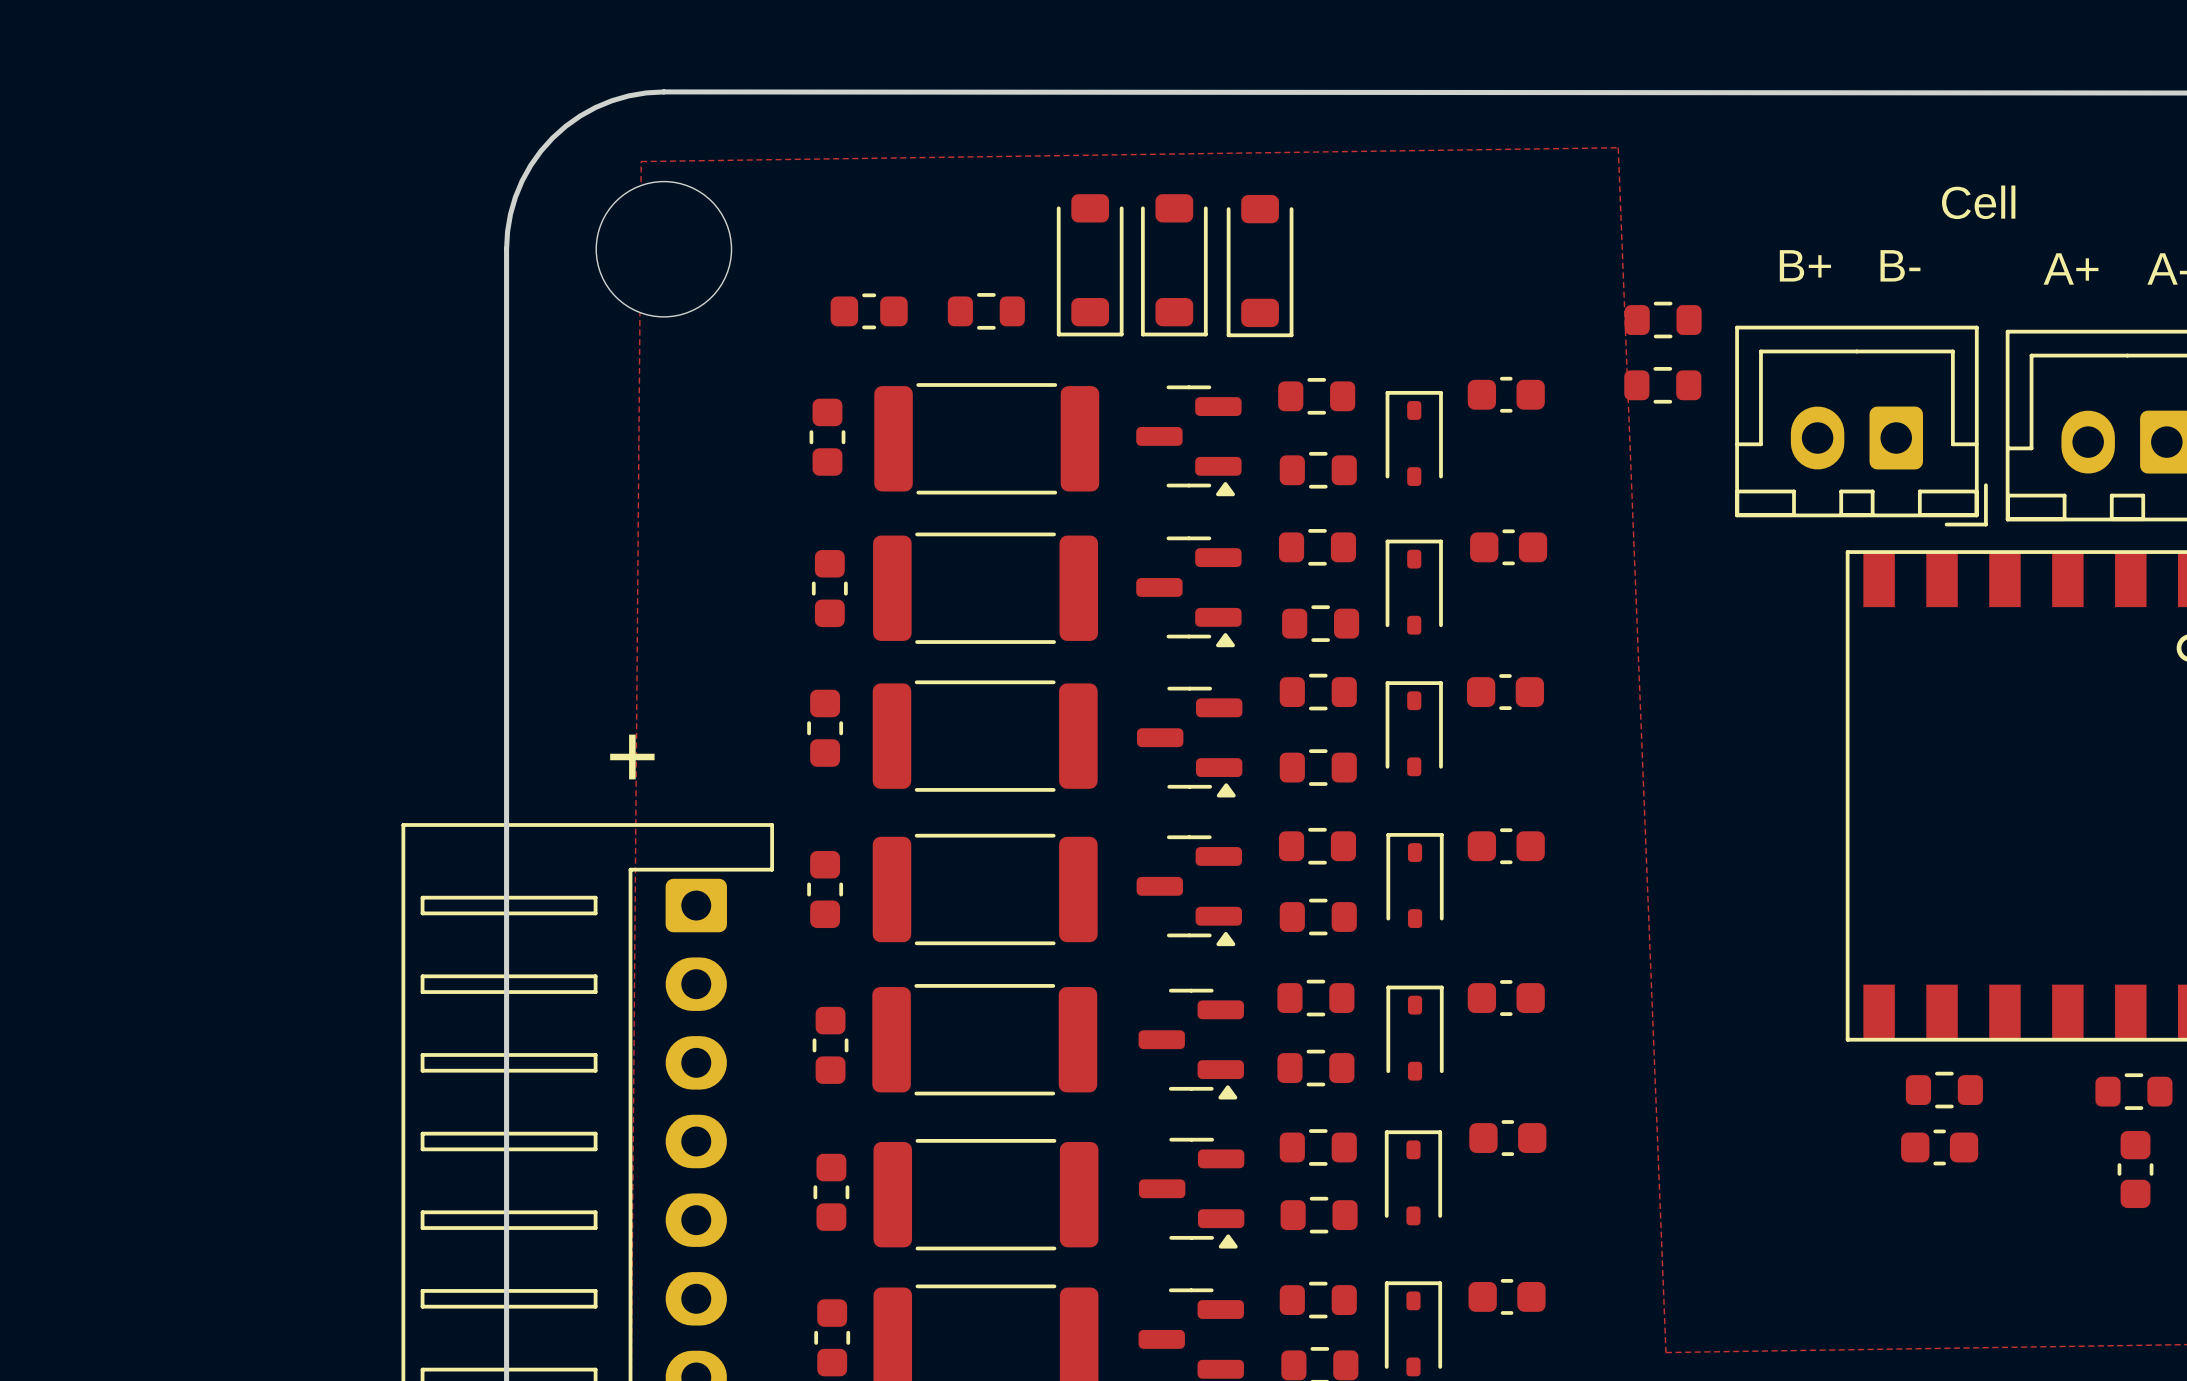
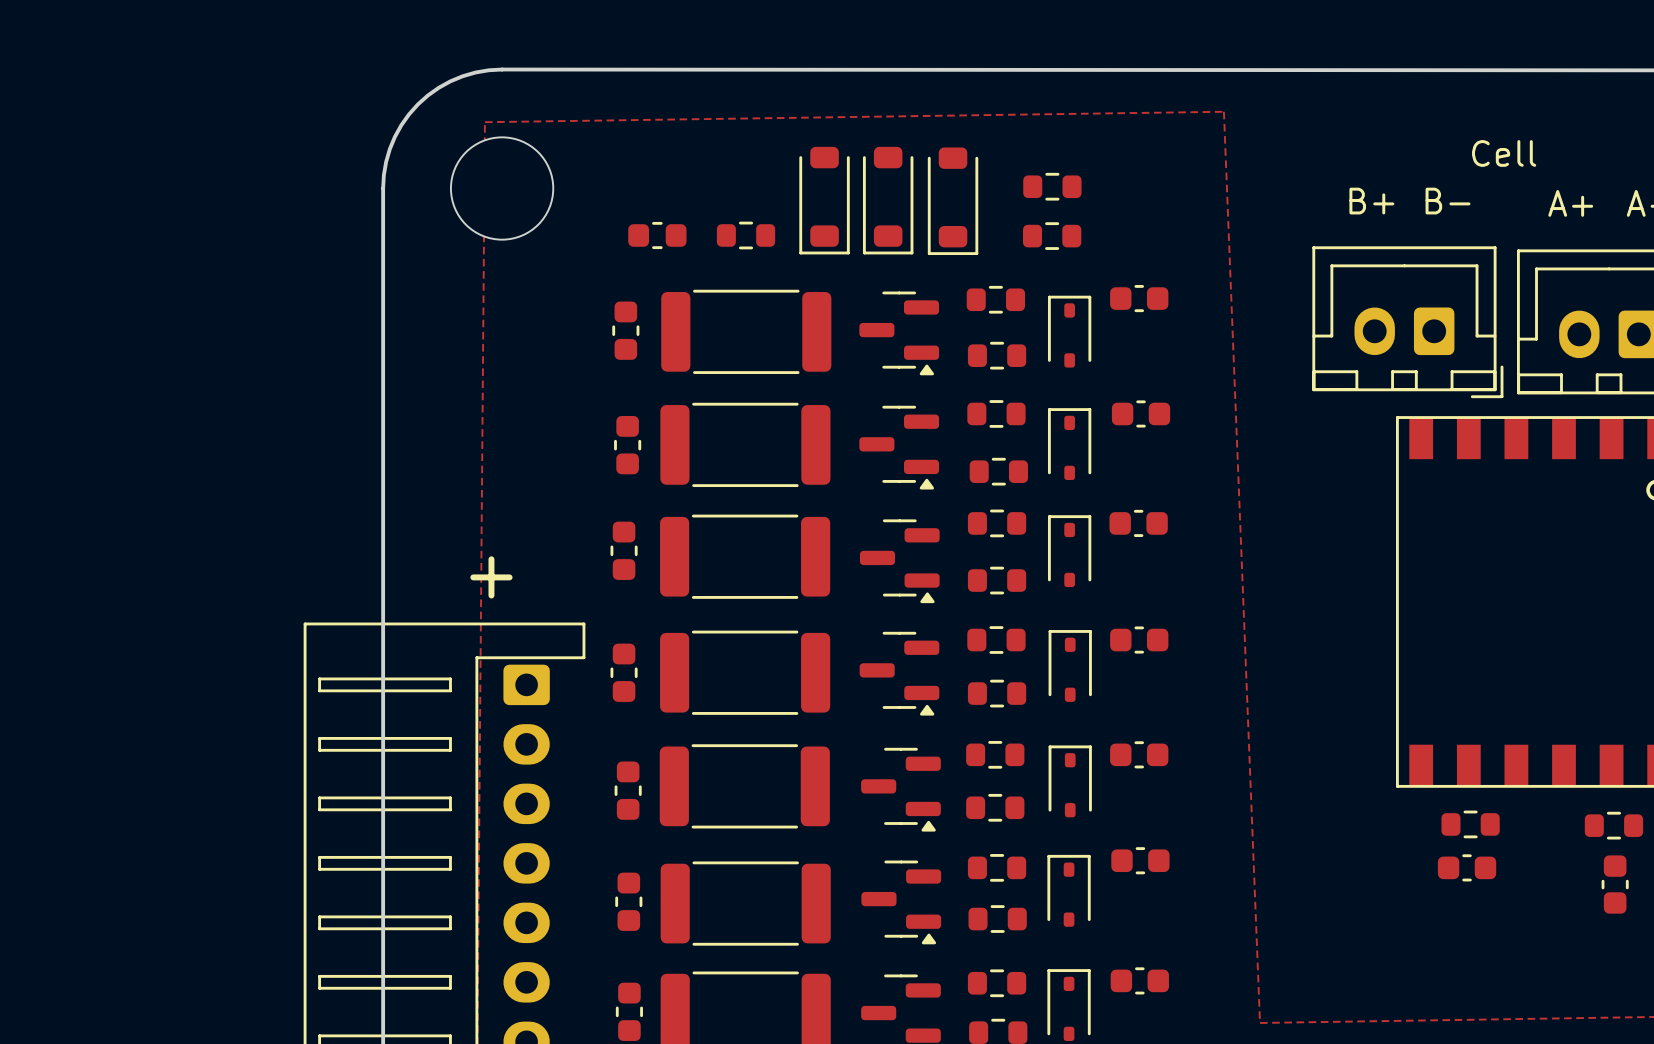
part: none -> (1052, 186)
part: none -> (1052, 236)
part: (1663, 320) -> none
part: (1662, 385) -> none

